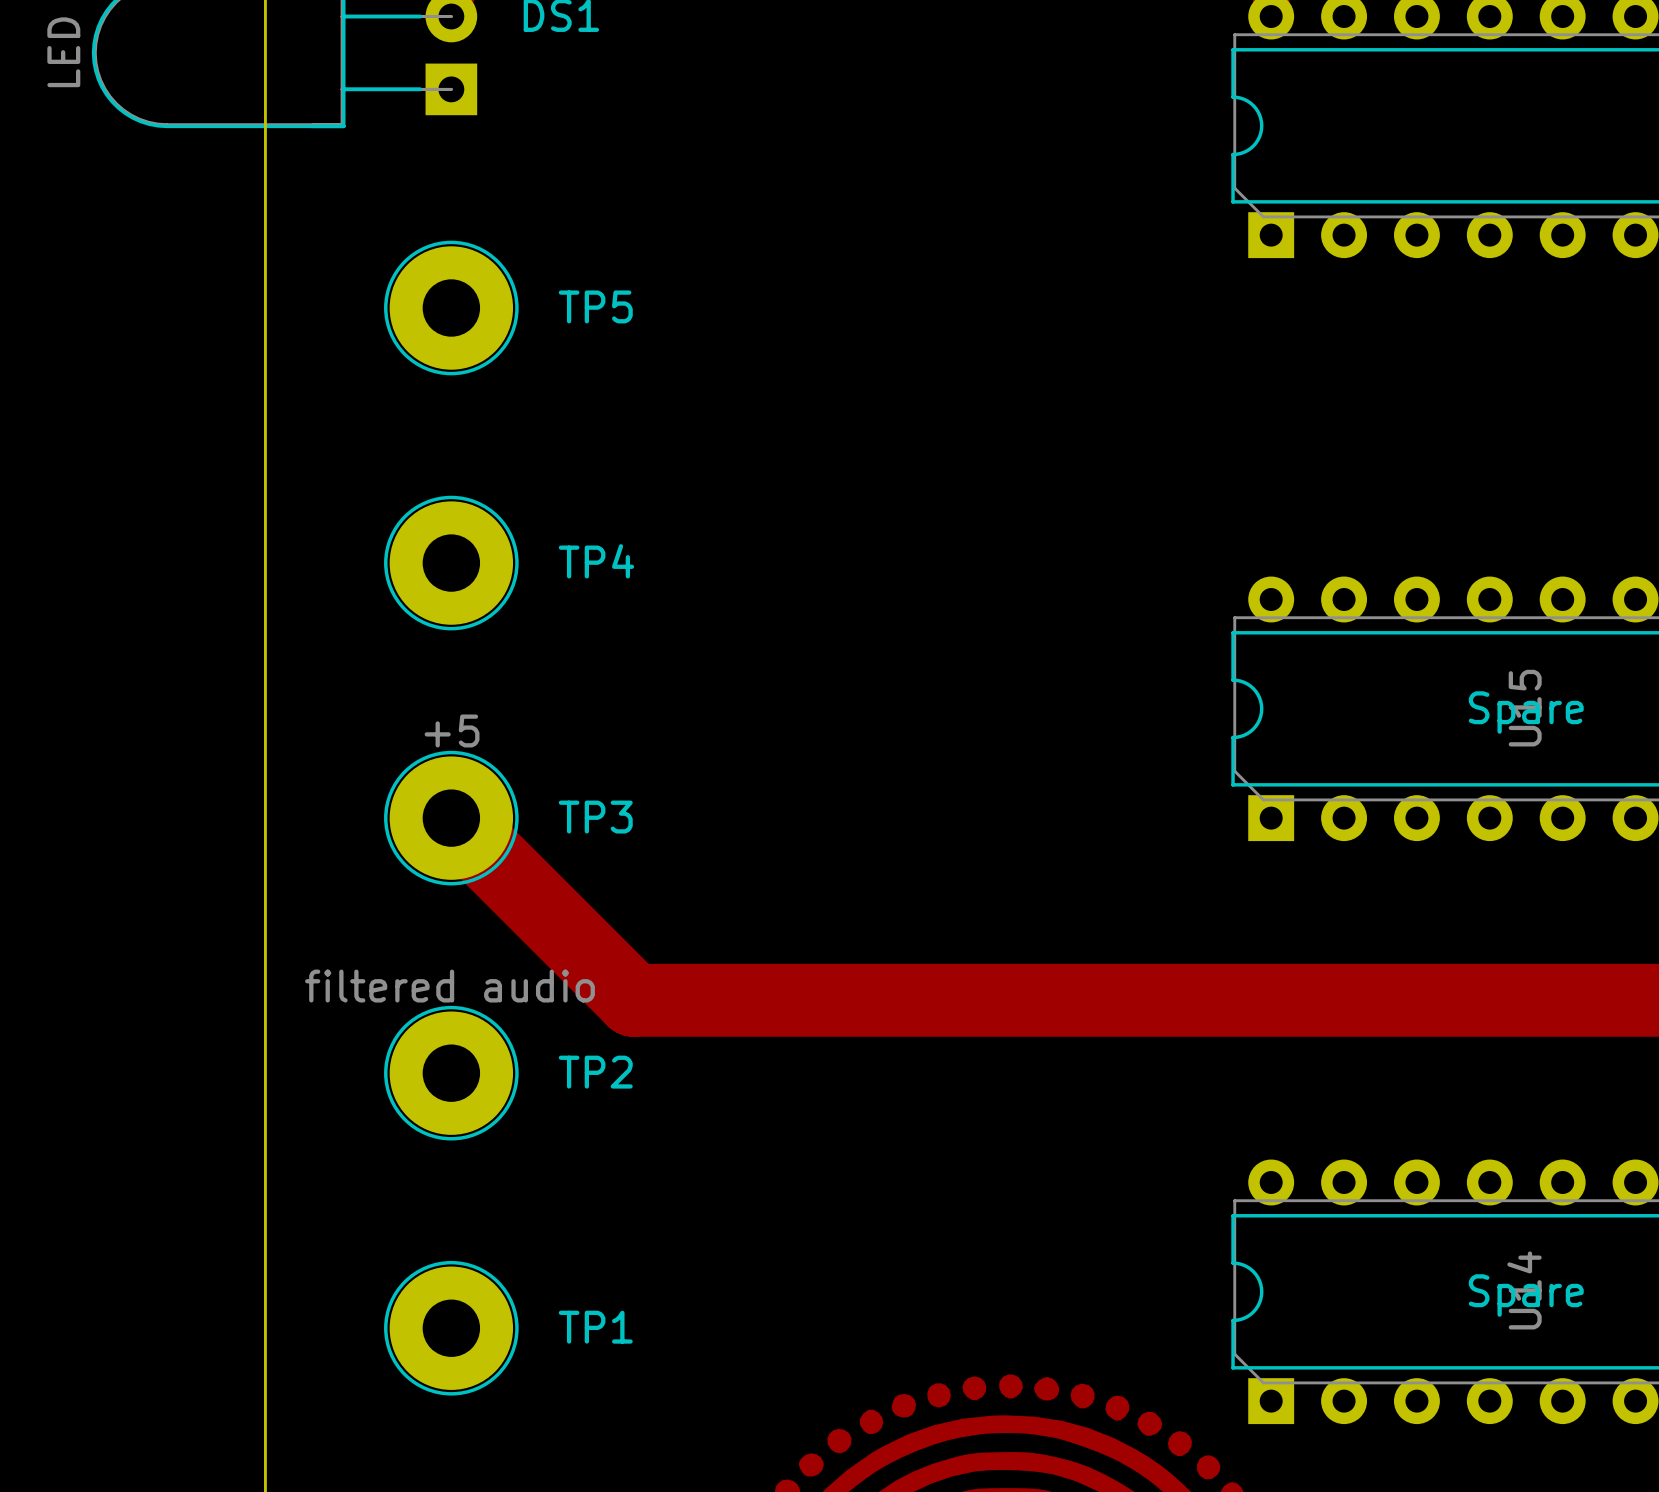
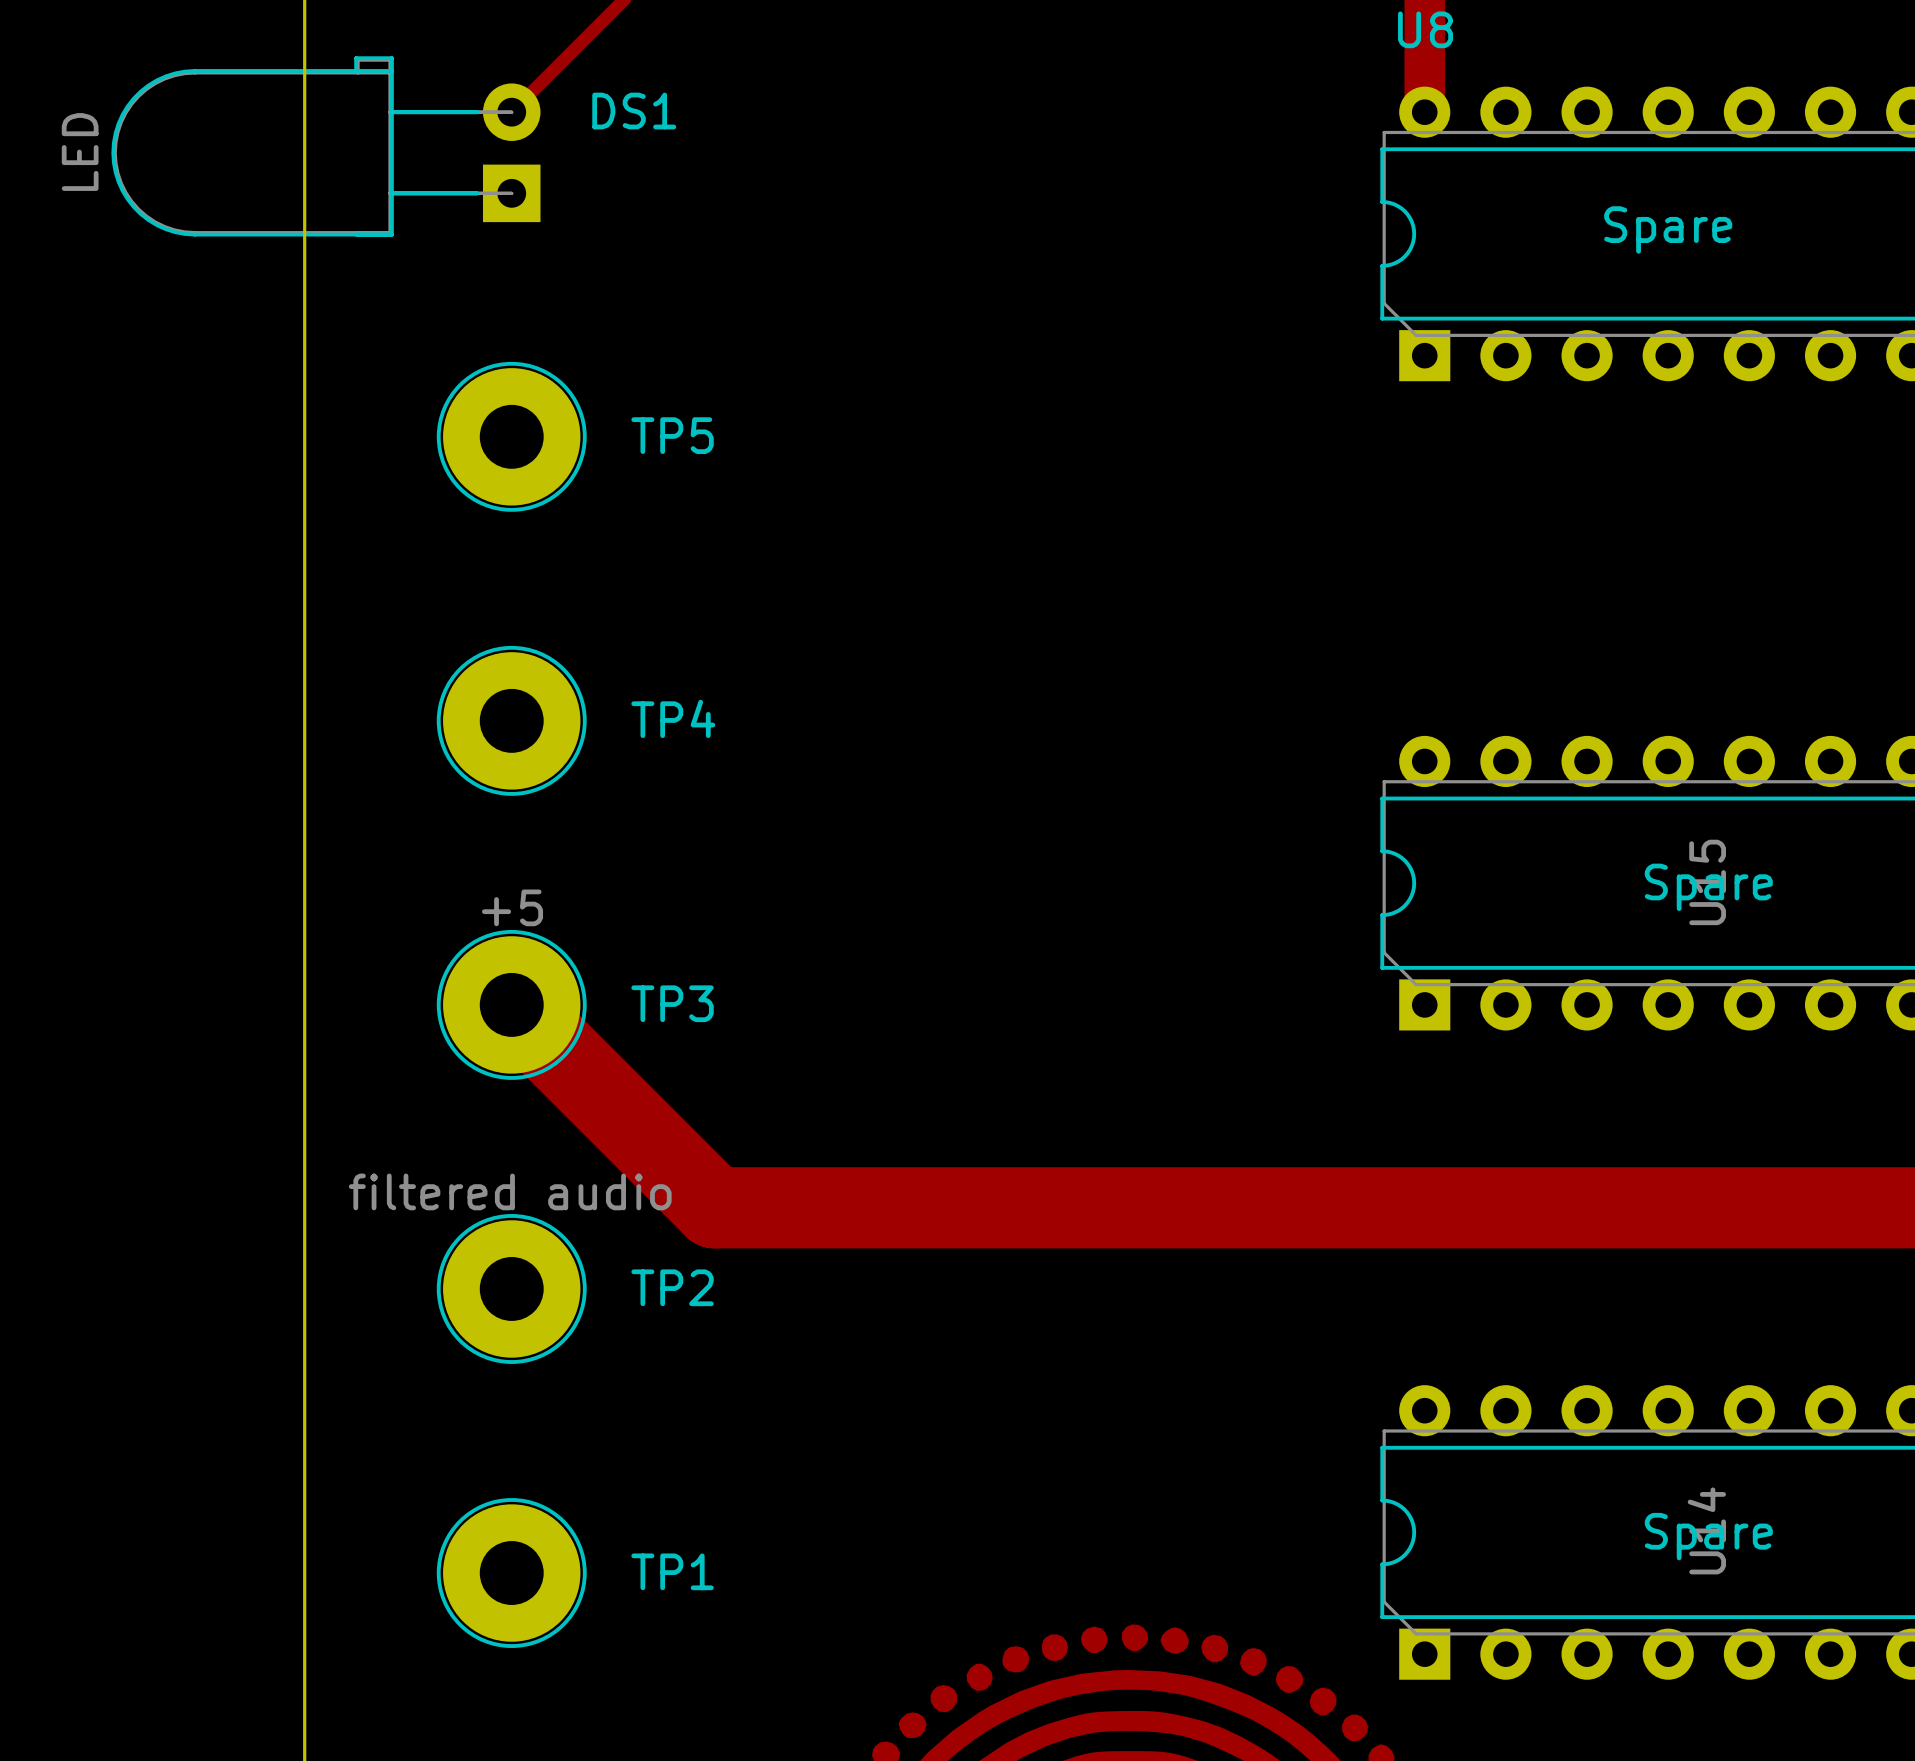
text: none -> Spare (1668, 229)

